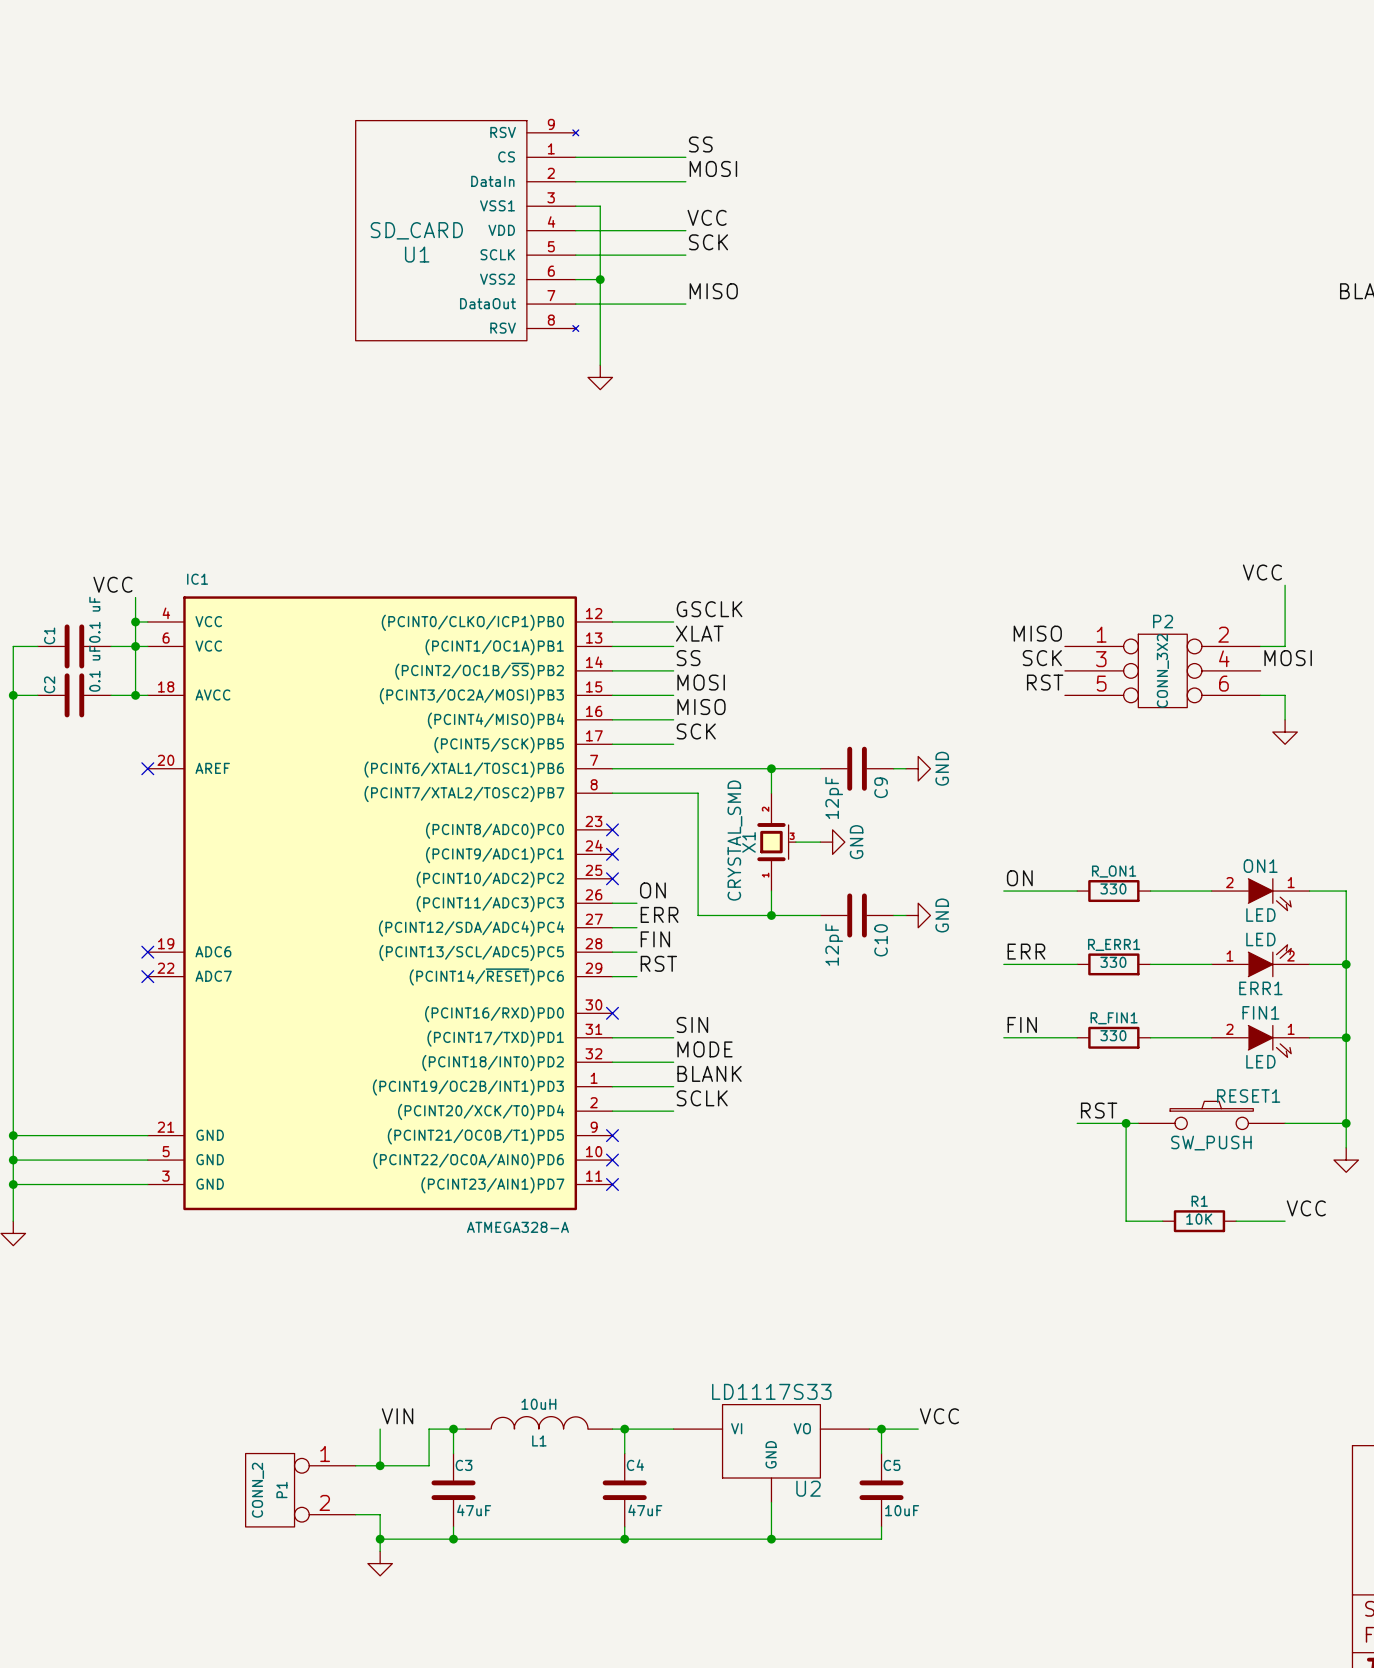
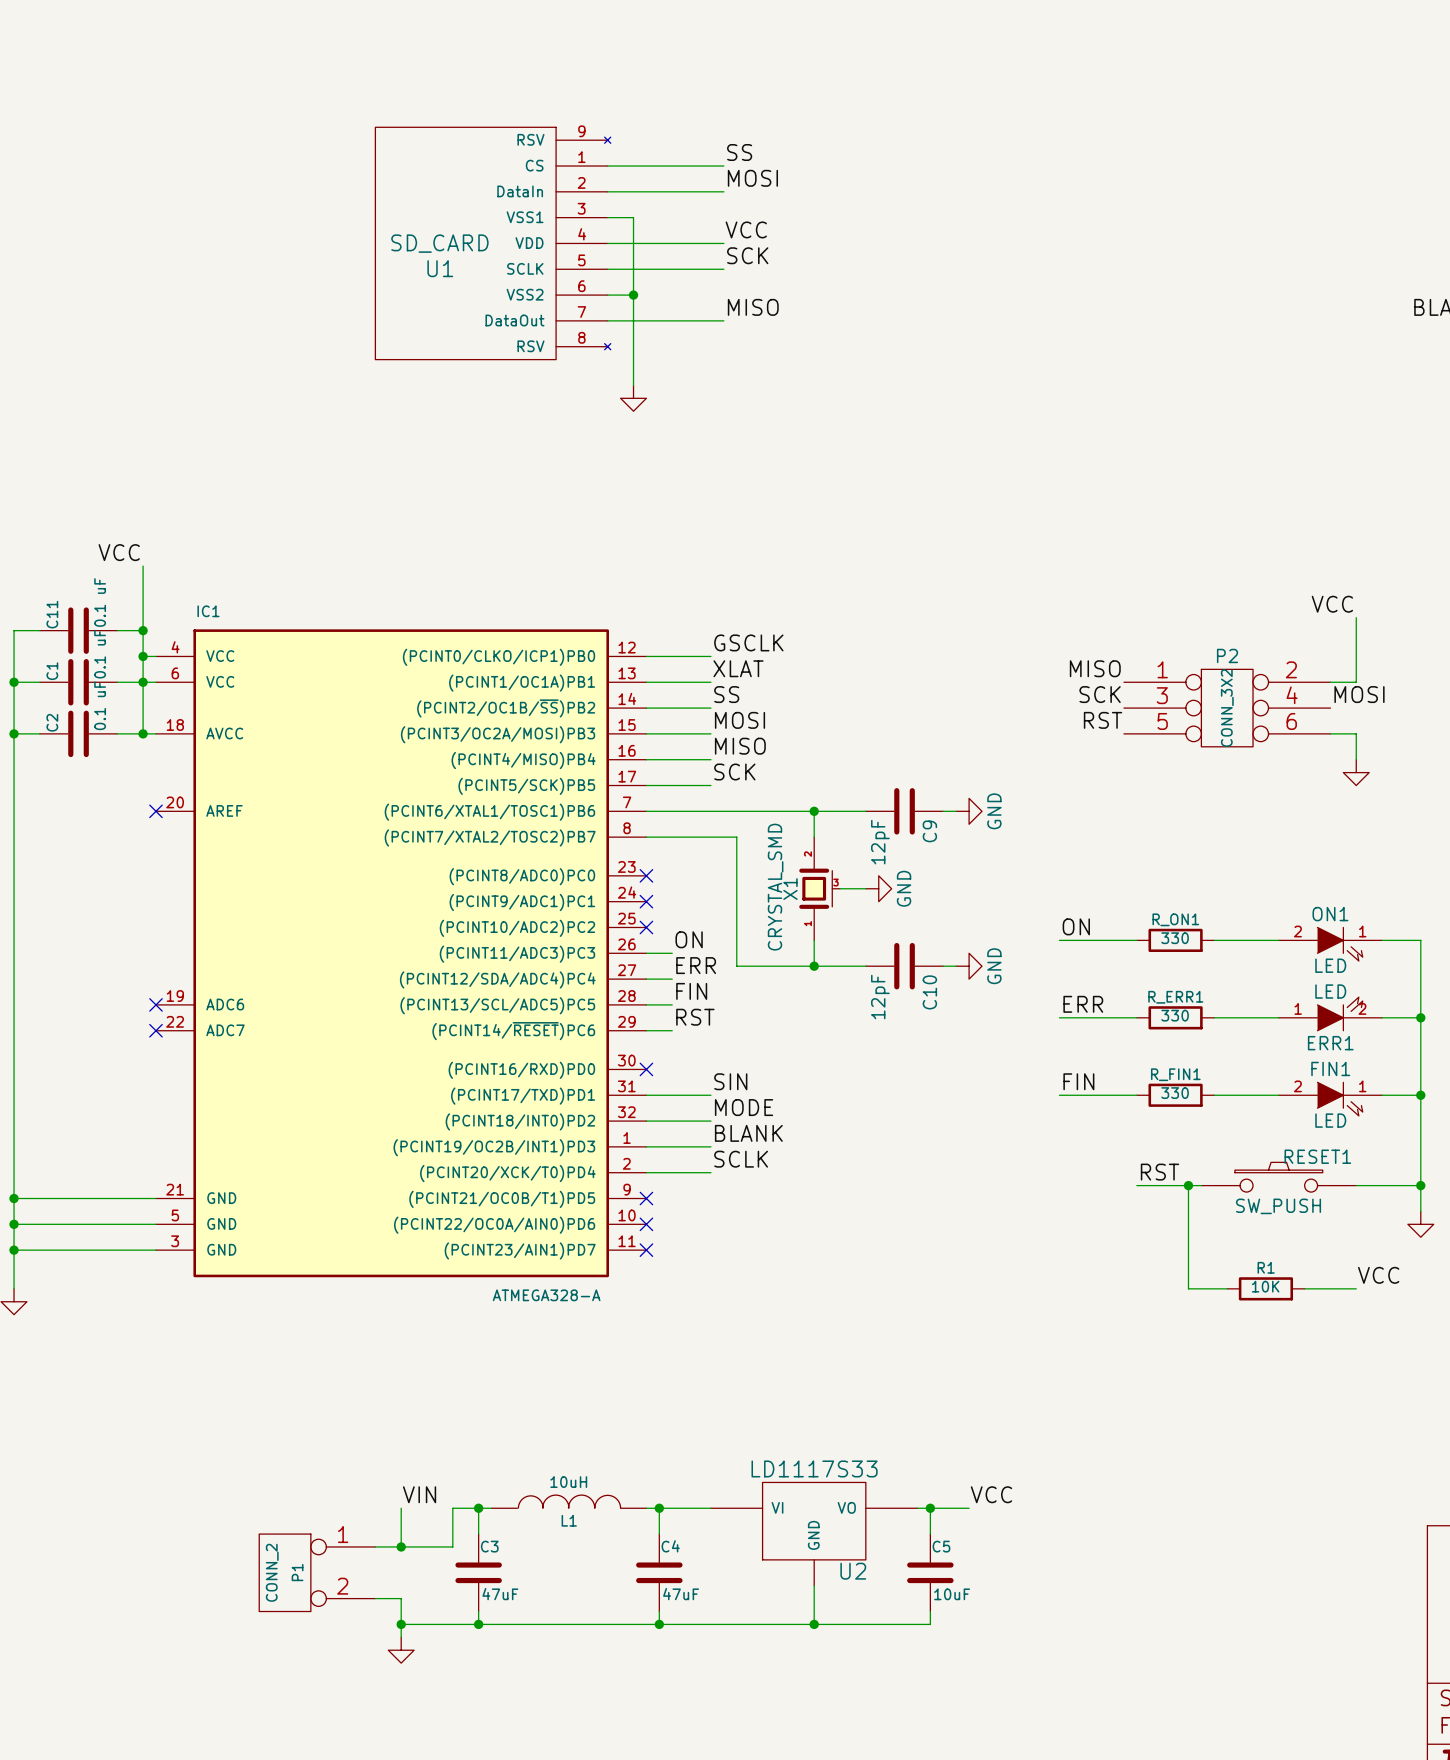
wire: none -> (143, 566) (143, 630) (117, 630)
label position: VCC (112, 584) -> VCC (119, 552)
wire: none -> (39, 630) (14, 630) (14, 682)
C11: none -> 0.1 uF (78, 630)
junction: none -> (143, 630)
junction: none -> (14, 682)

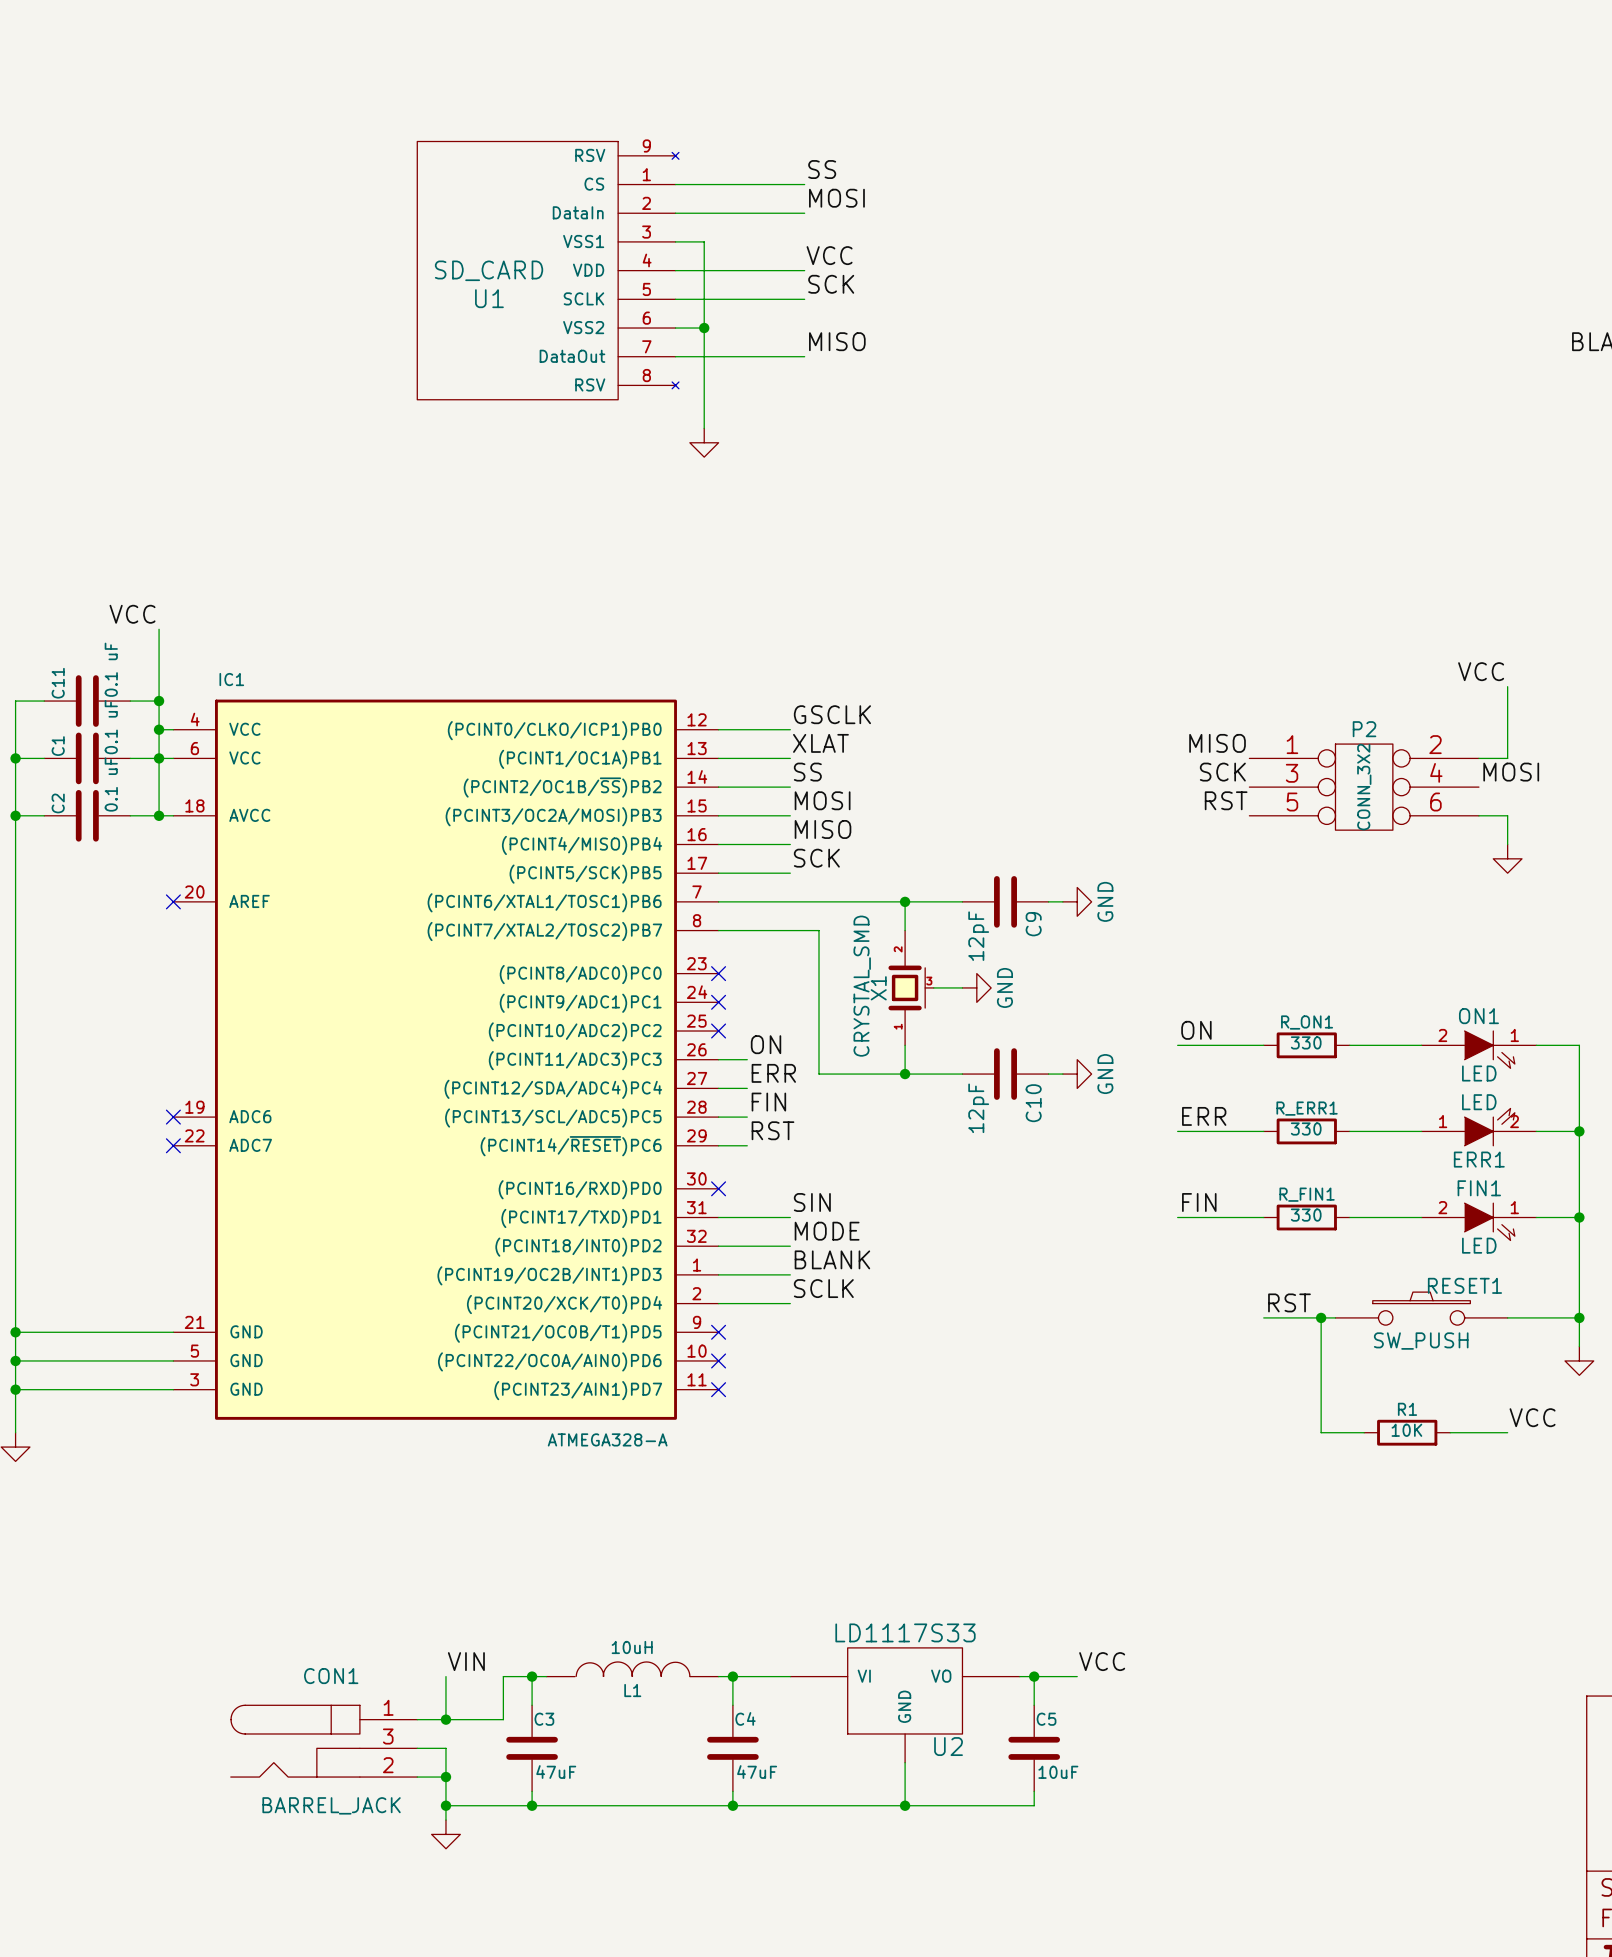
CON1: none -> BARREL_JACK (324, 1741)
P1: CONN_2 (317, 1572) -> none
wire: none -> (417, 1748) (445, 1748) (445, 1777)
junction: none -> (445, 1777)

